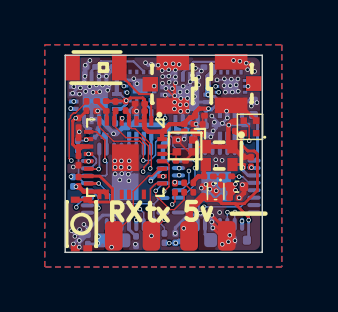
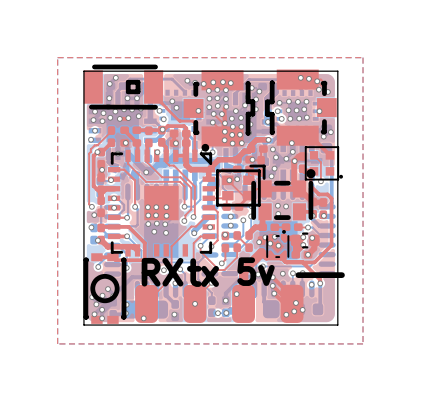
via: none -> (163, 270)

